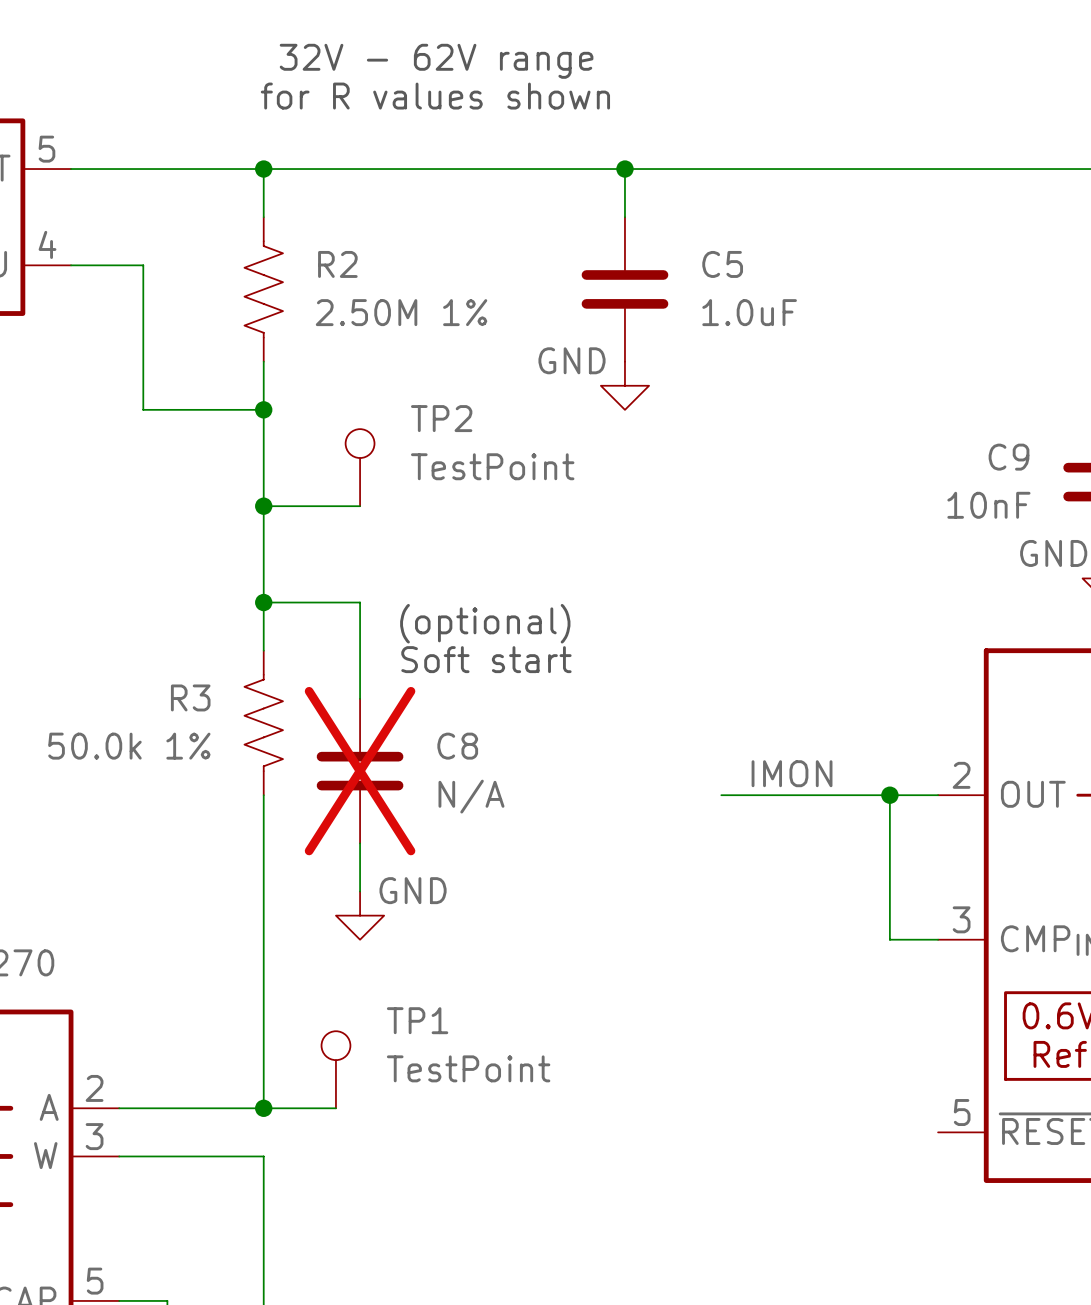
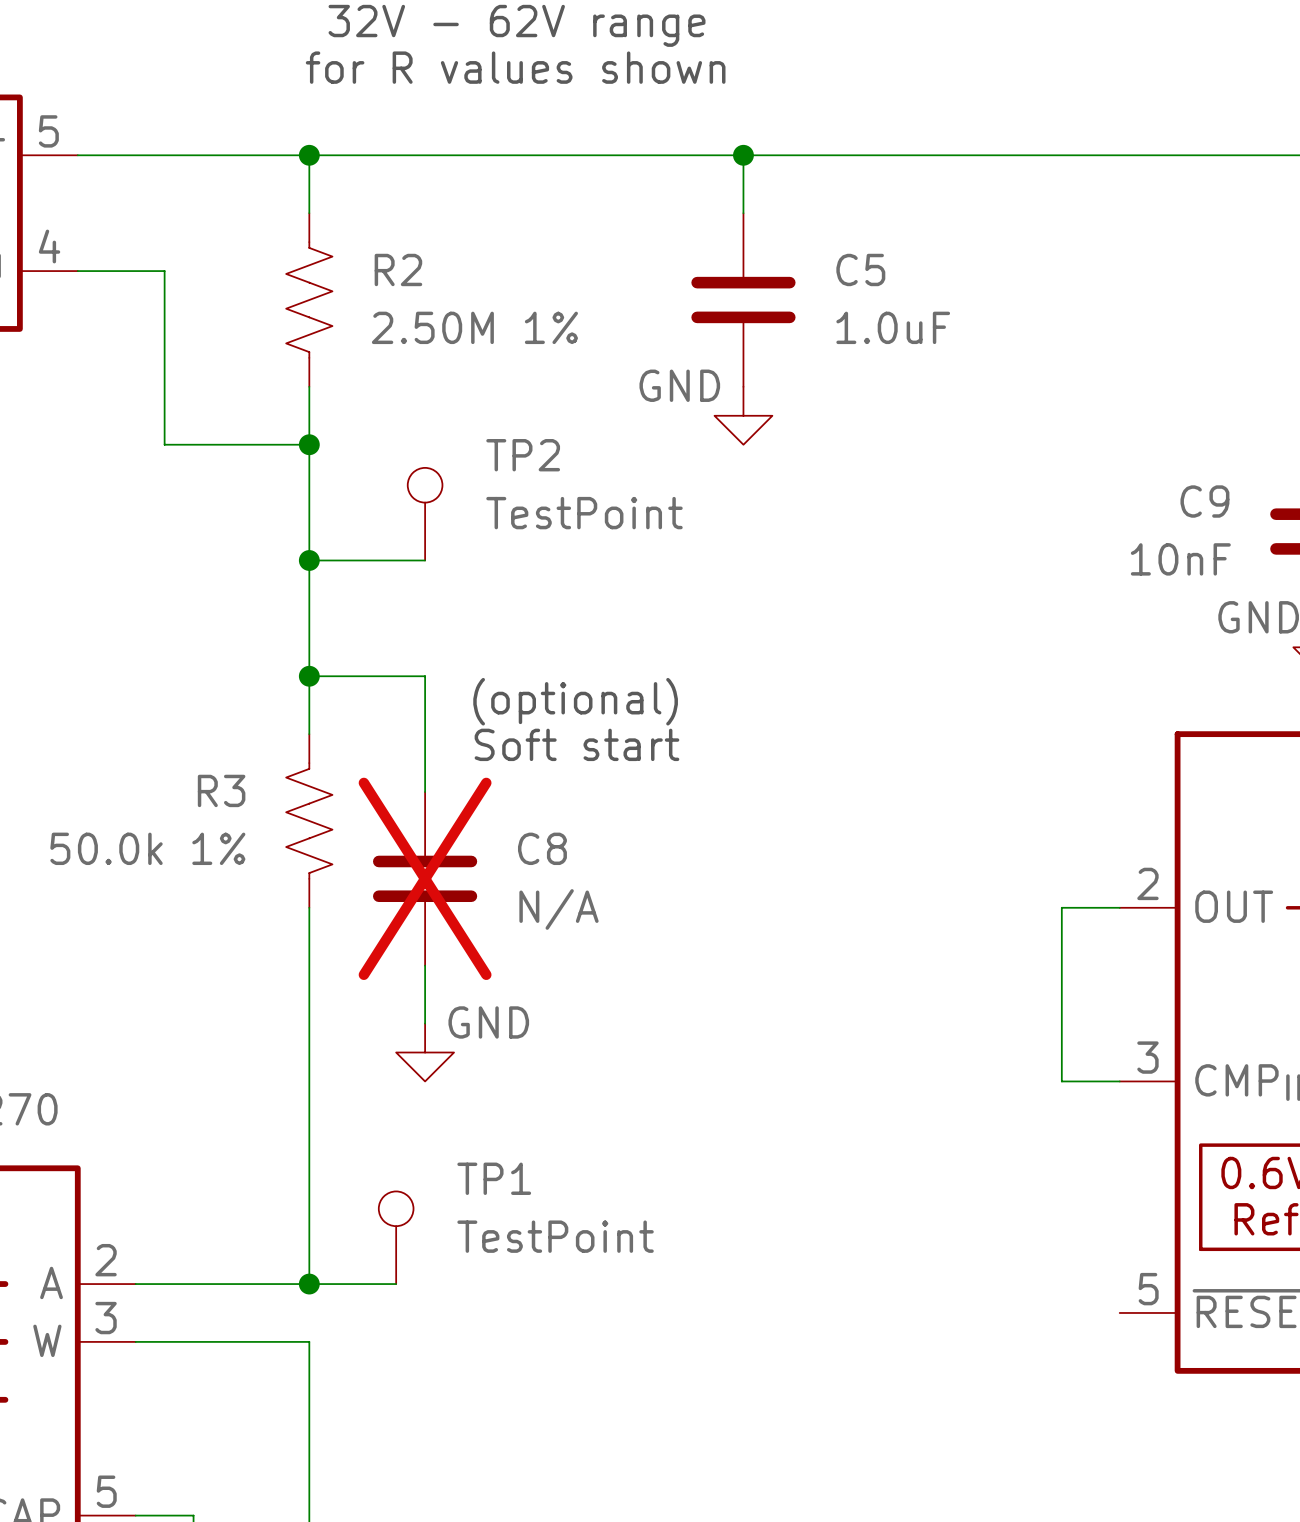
label: IMON (792, 773) -> none
wire: (721, 795) (889, 795) -> none
junction: (889, 795) -> none

